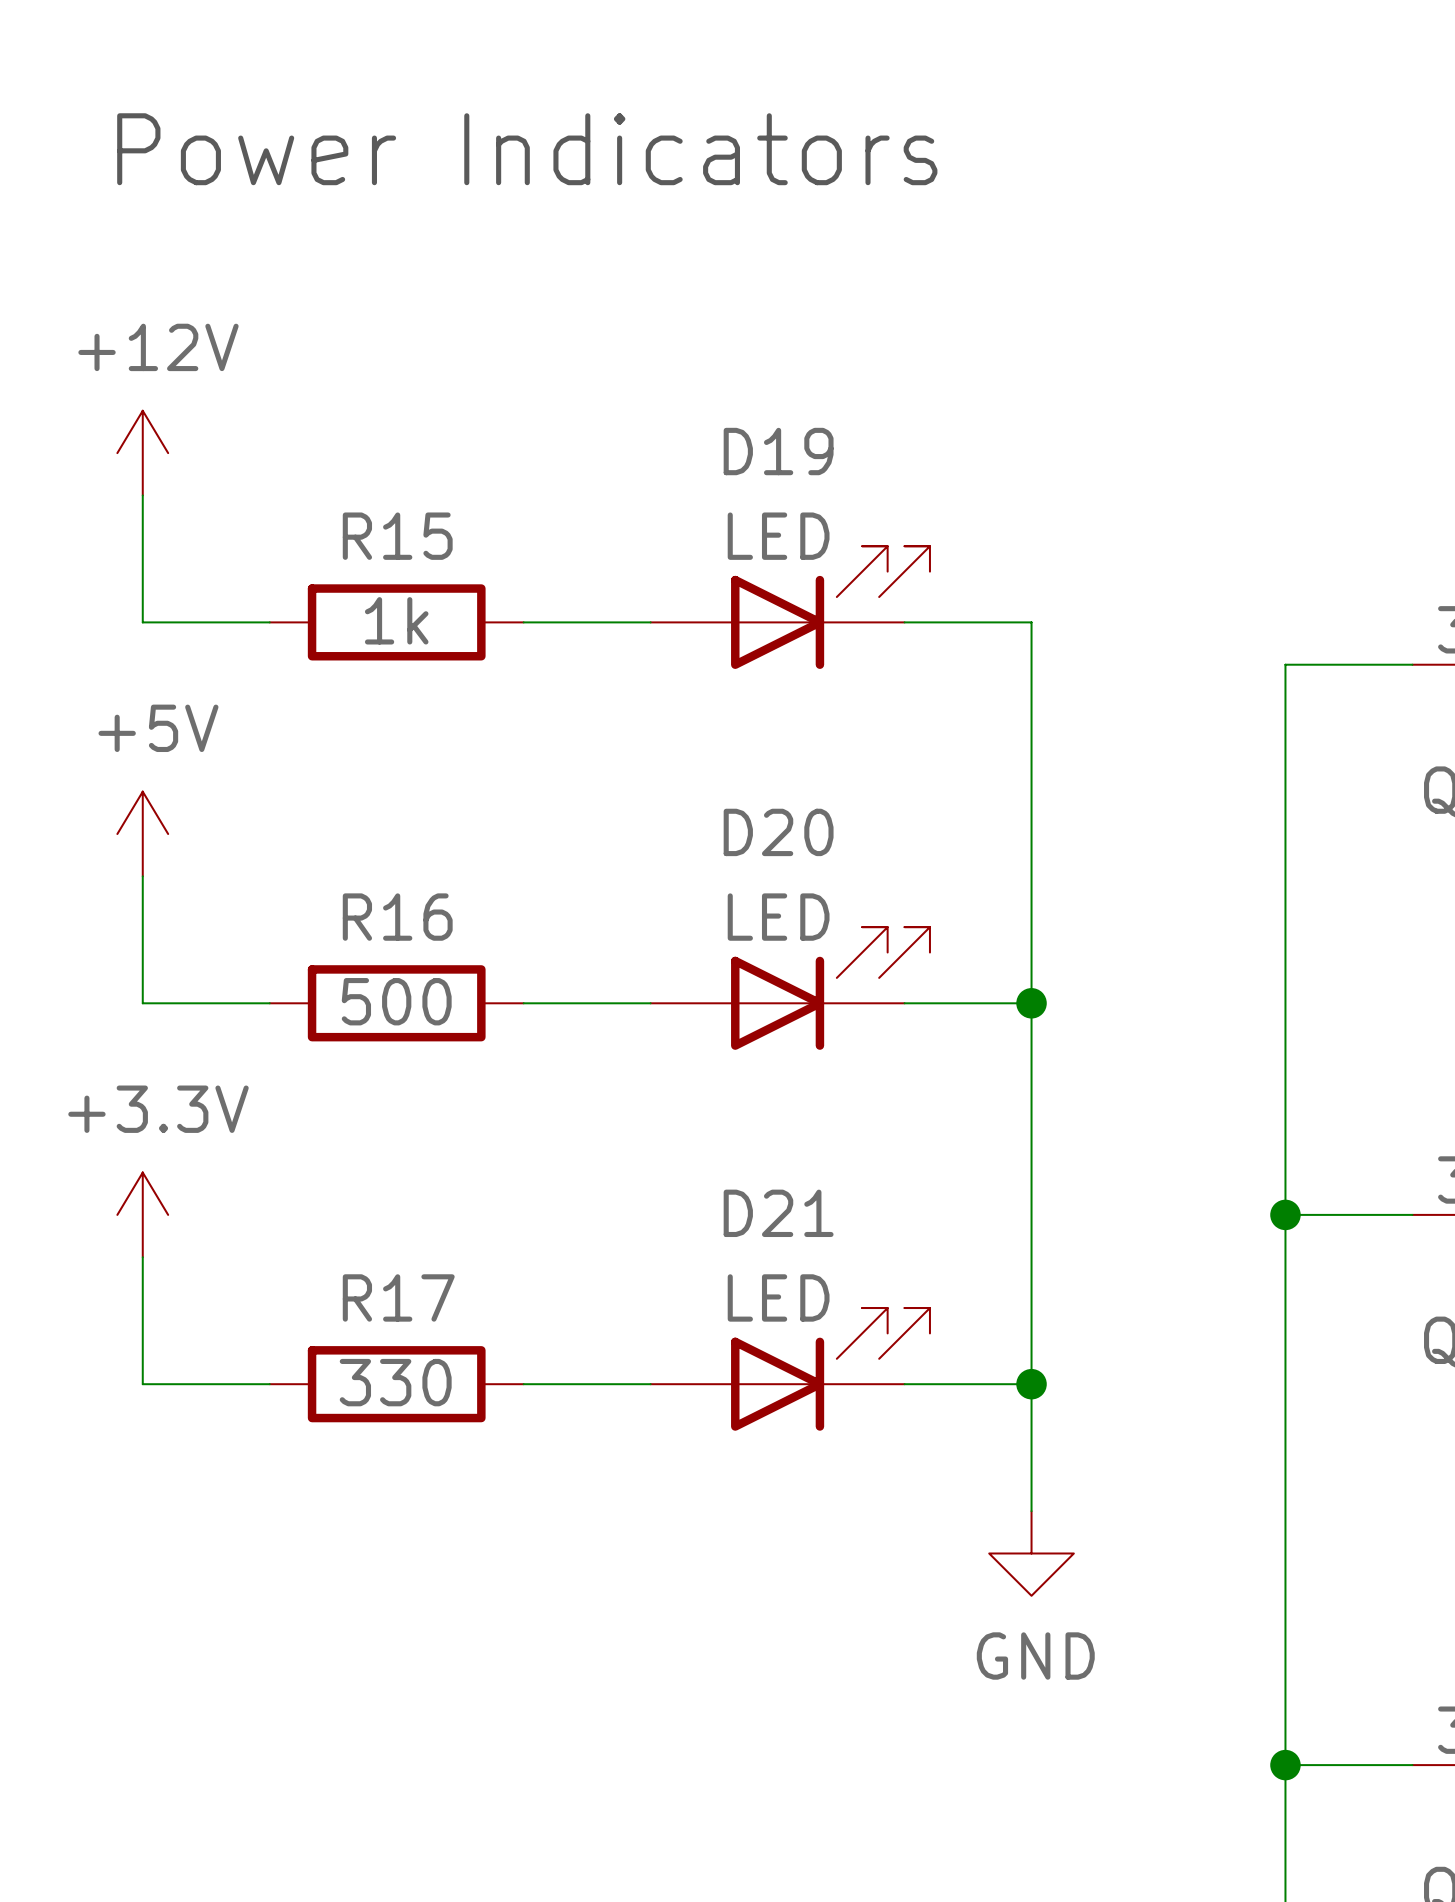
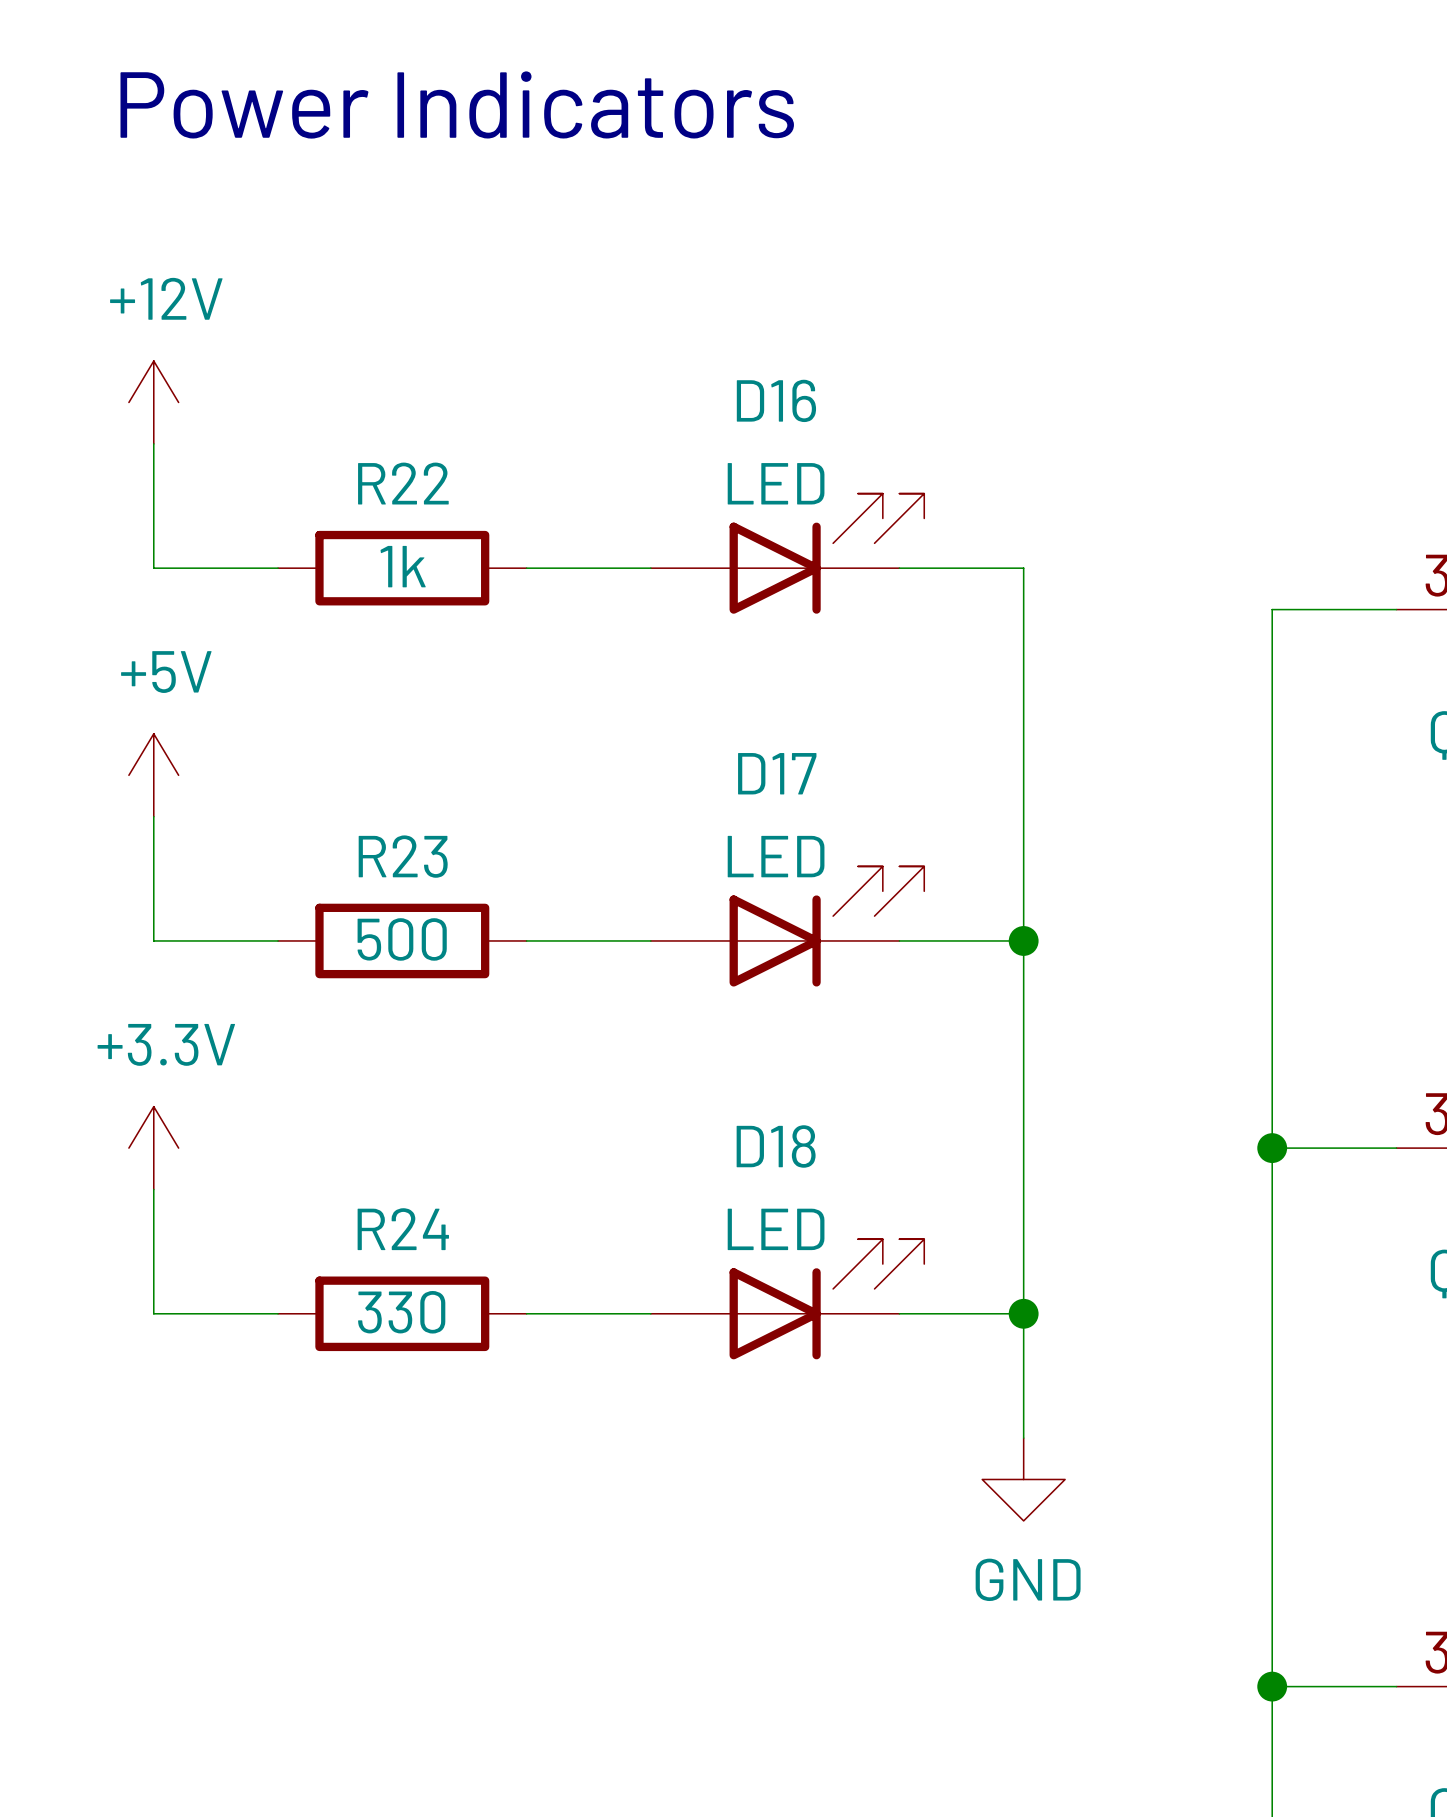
D19 name: D19 (778, 451) -> D16 (776, 400)
R15 name: R15 (397, 536) -> R22 (403, 483)
D20 name: D20 (778, 832) -> D17 (777, 773)
R16 name: R16 (397, 917) -> R23 (403, 856)
D21 name: D21 (778, 1213) -> D18 (776, 1146)
R17 name: R17 (398, 1297) -> R24 (403, 1229)

